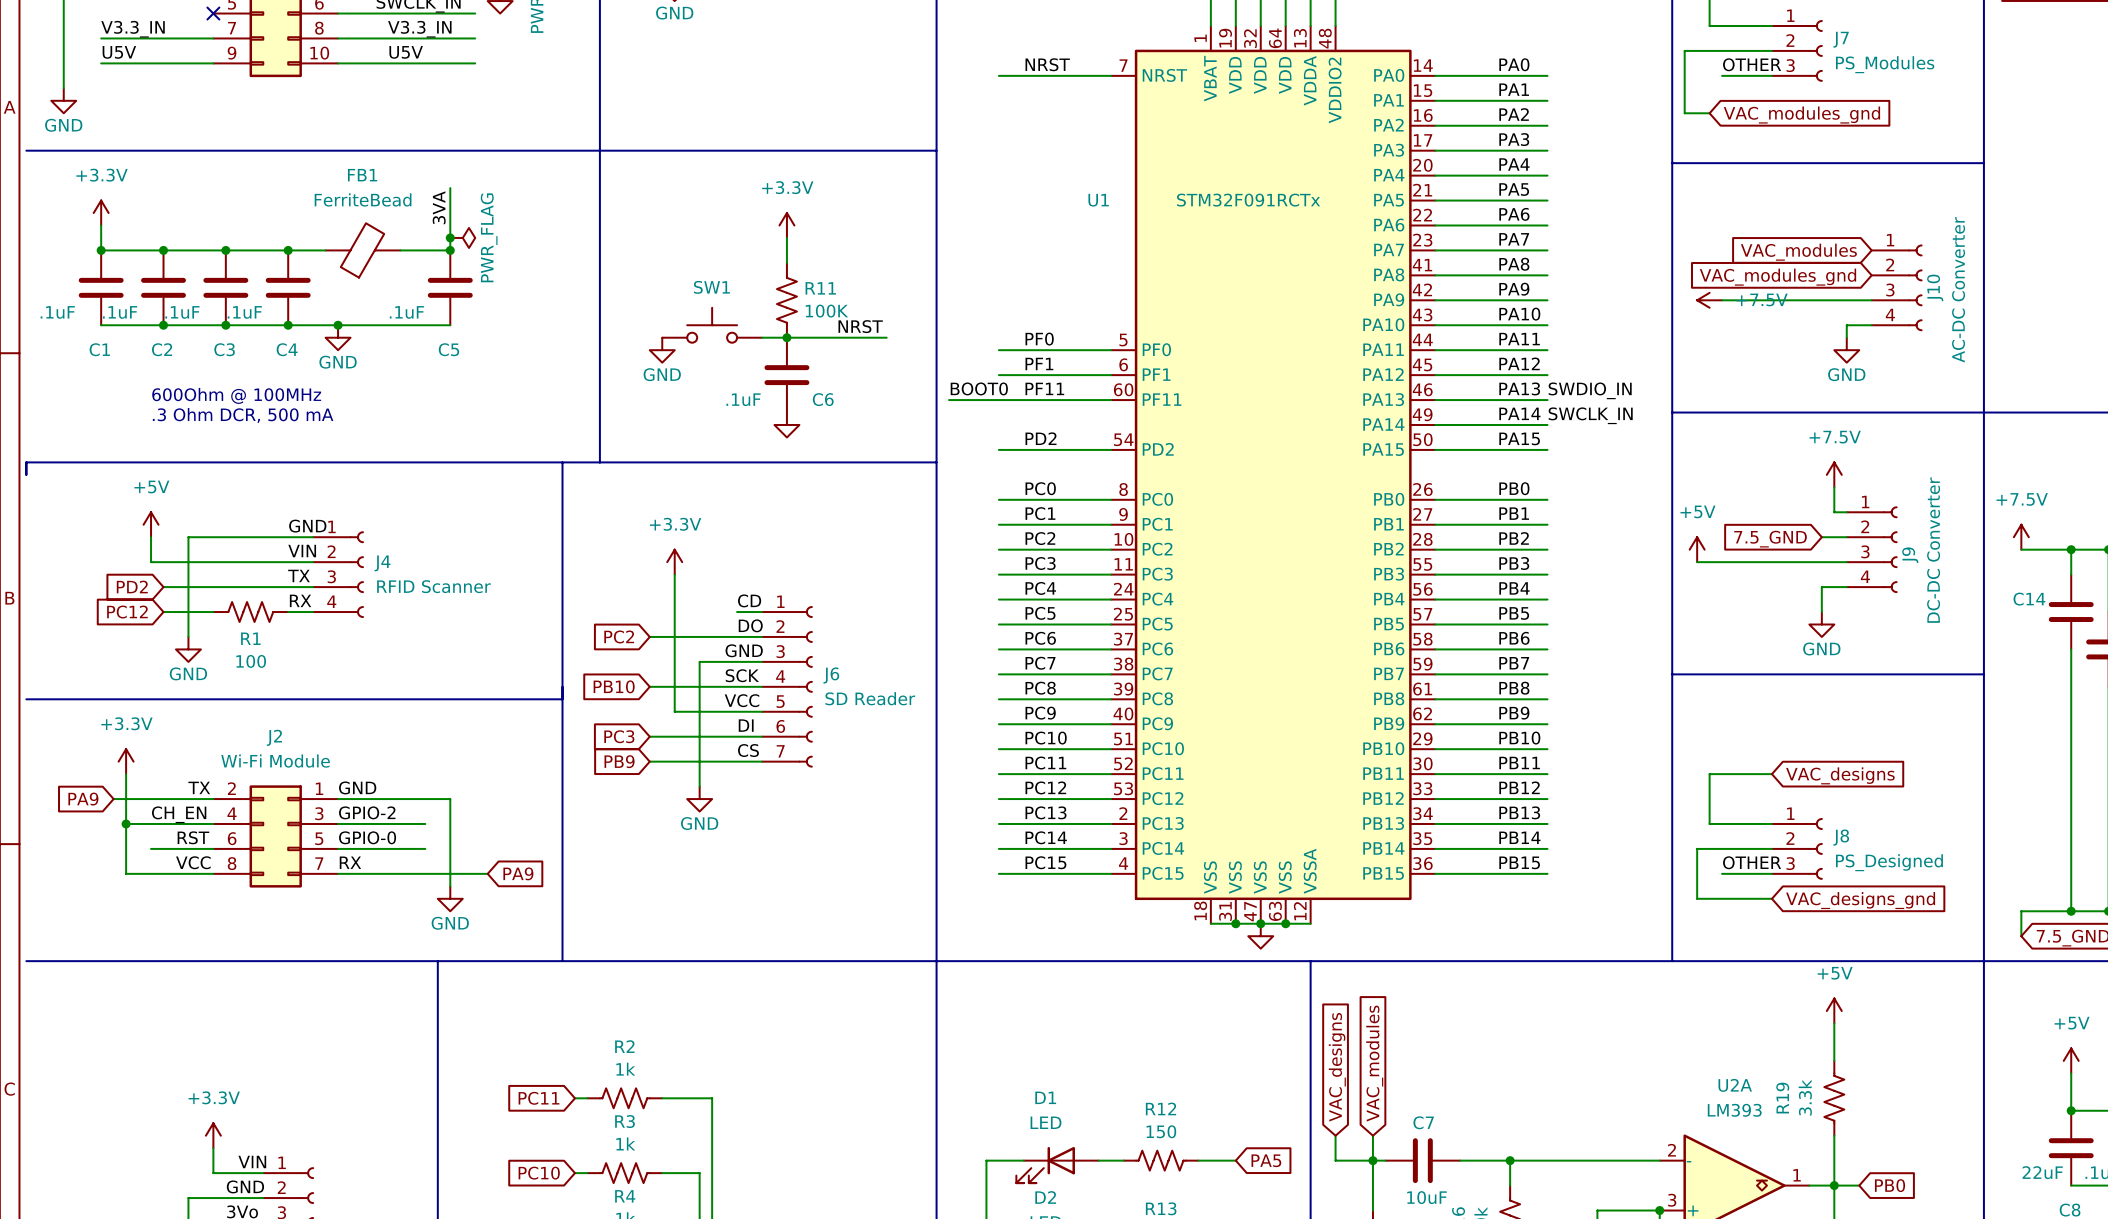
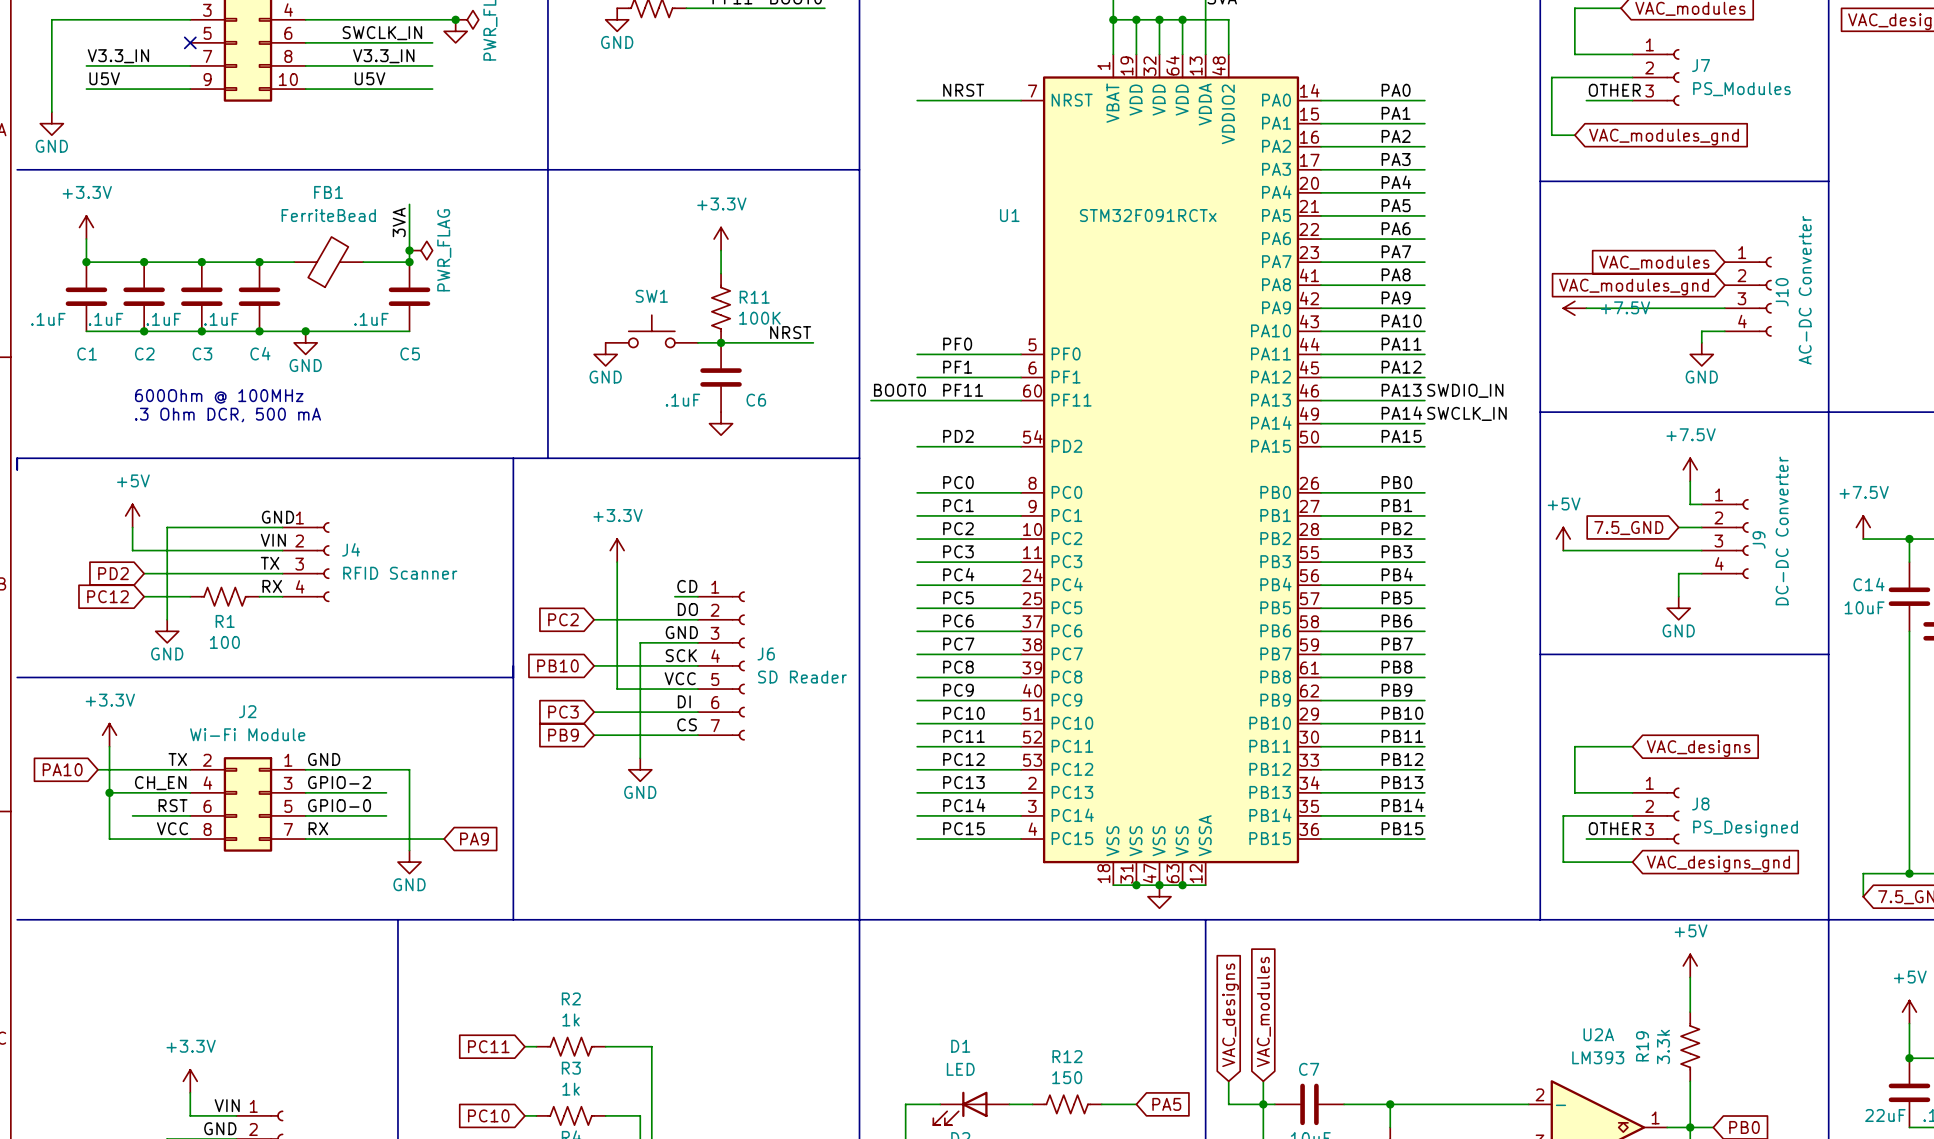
C14 value: none -> 10uF (1864, 607)
global label: PA9 (83, 799) -> PA10 (62, 769)

